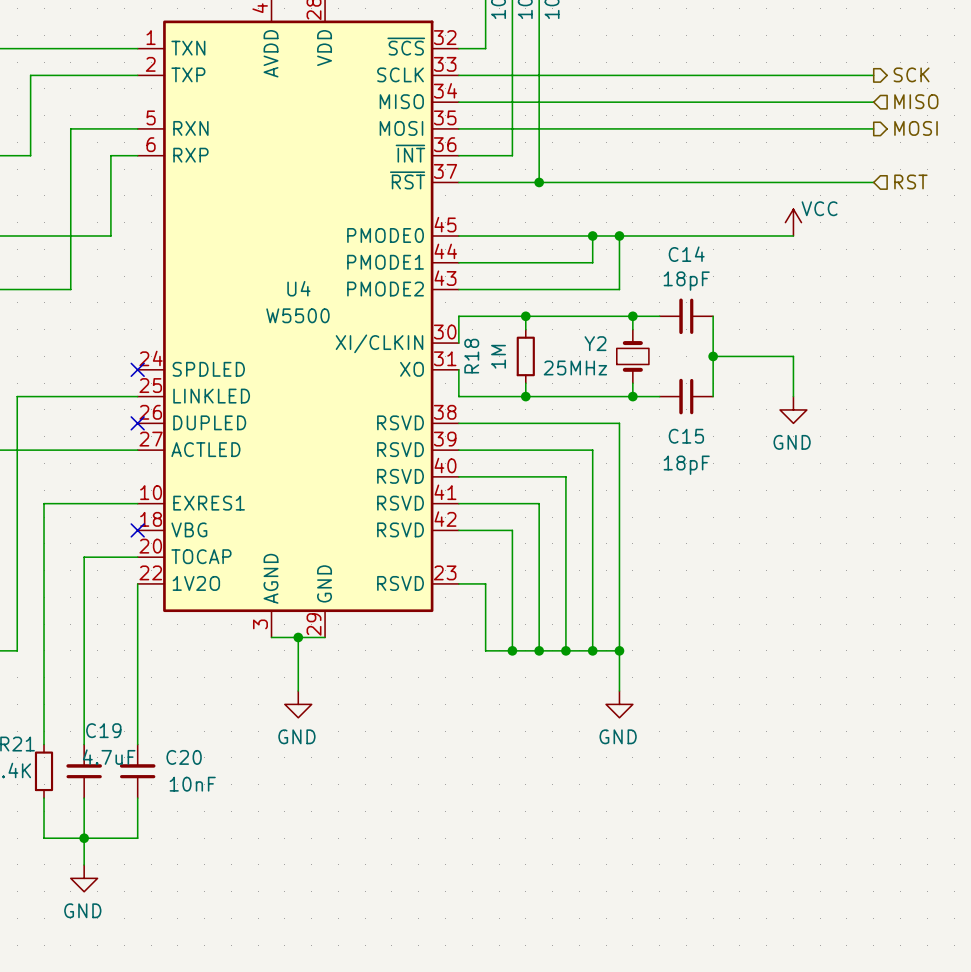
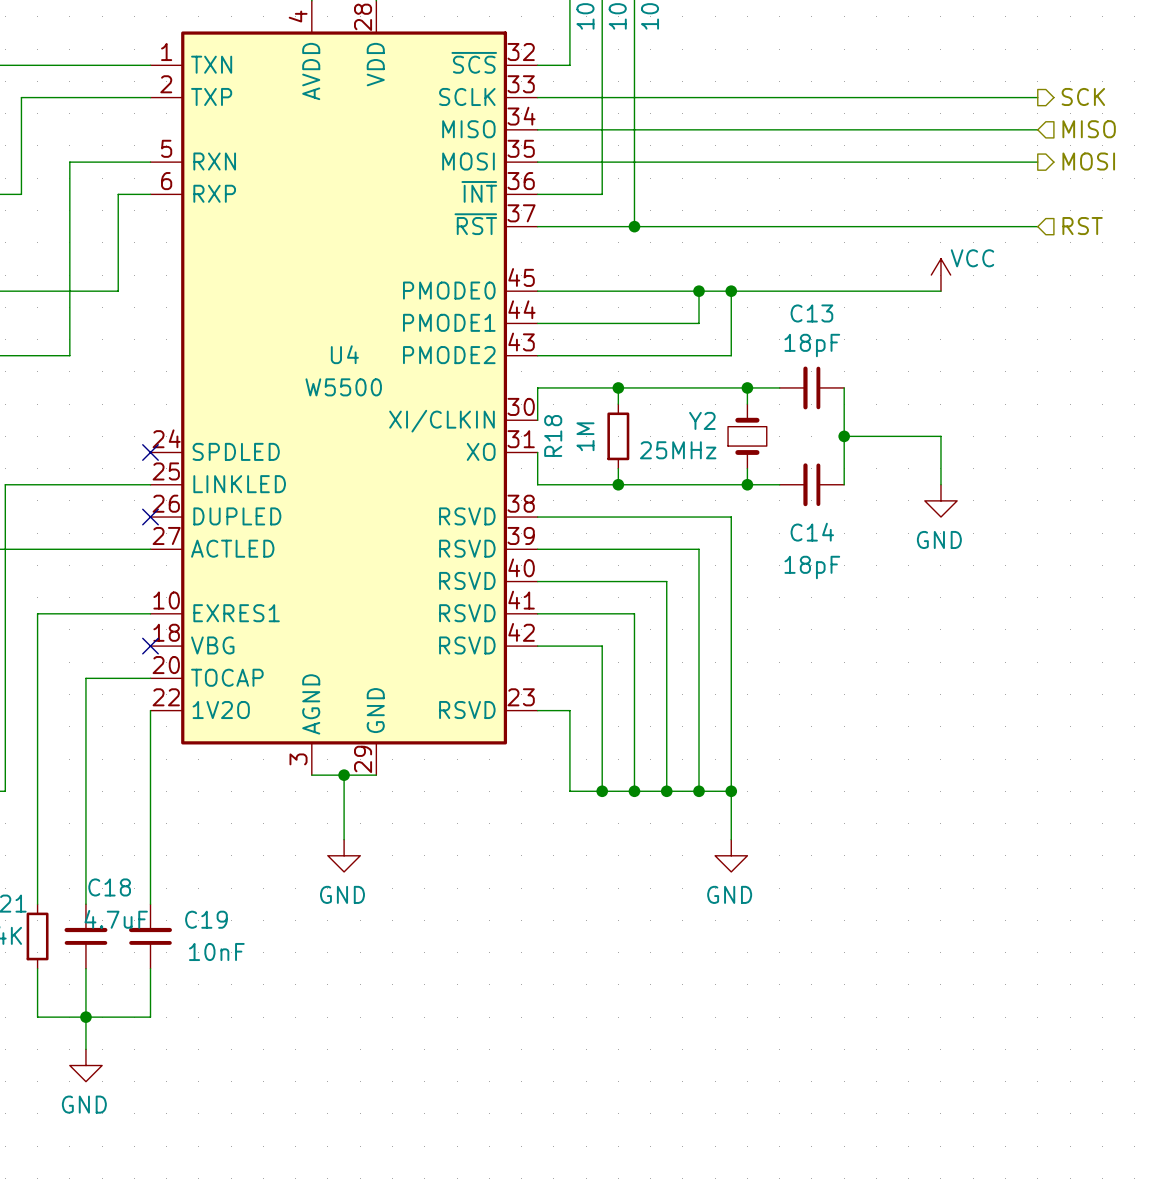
C14 name: C14 (686, 254) -> C13 (811, 313)
C15 name: C15 (686, 436) -> C14 (812, 532)
C19 name: C19 (103, 730) -> C18 (109, 887)
C20 name: C20 (184, 757) -> C19 (206, 919)

